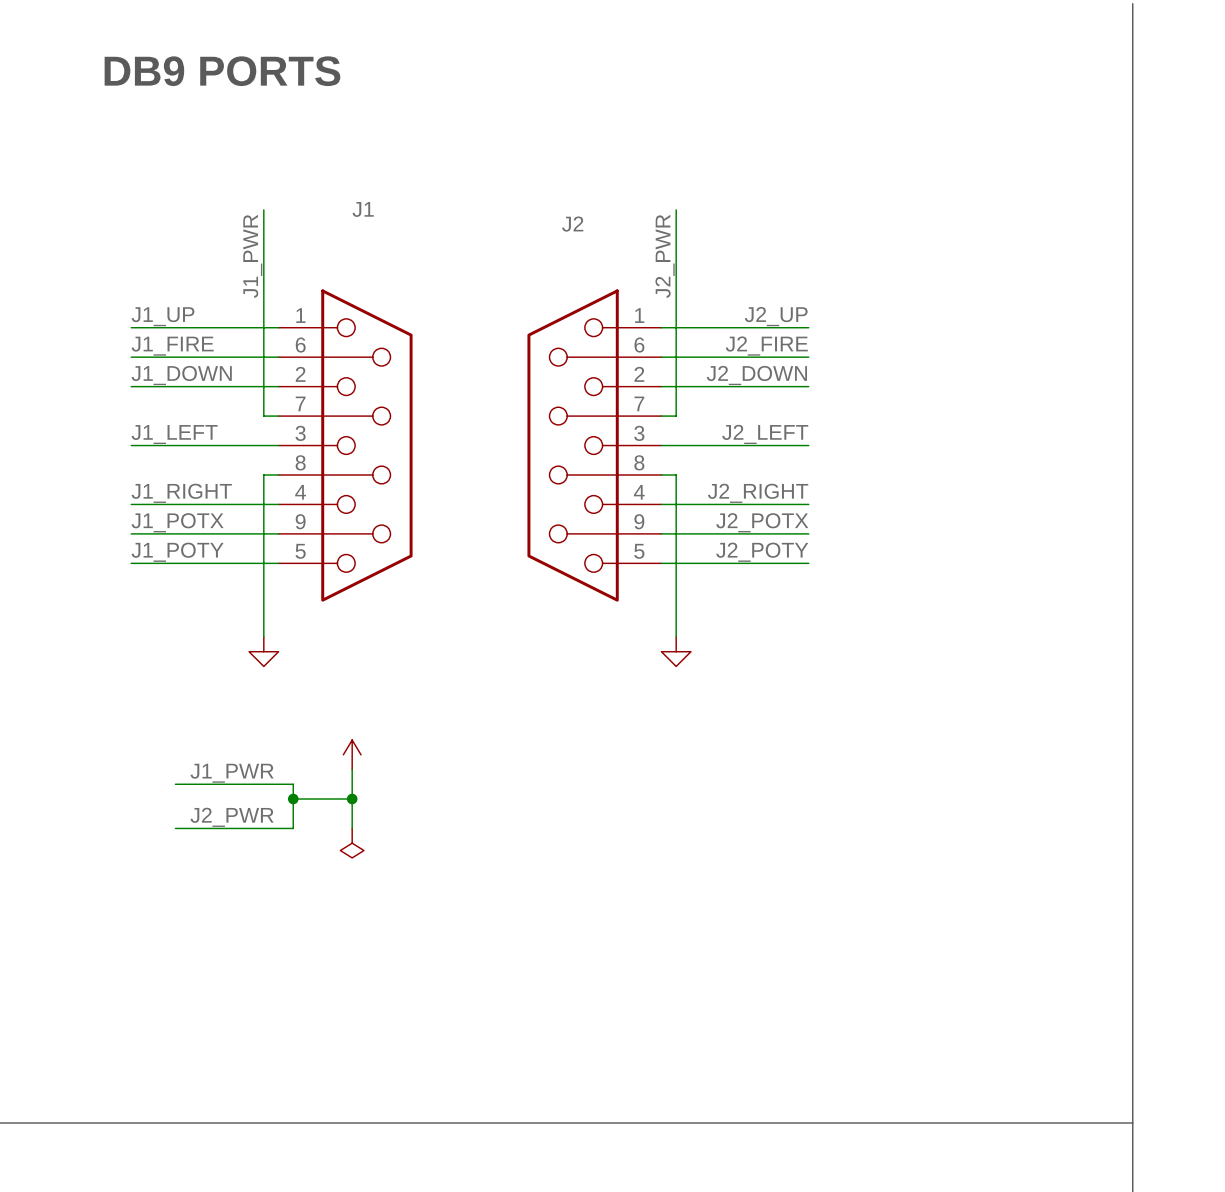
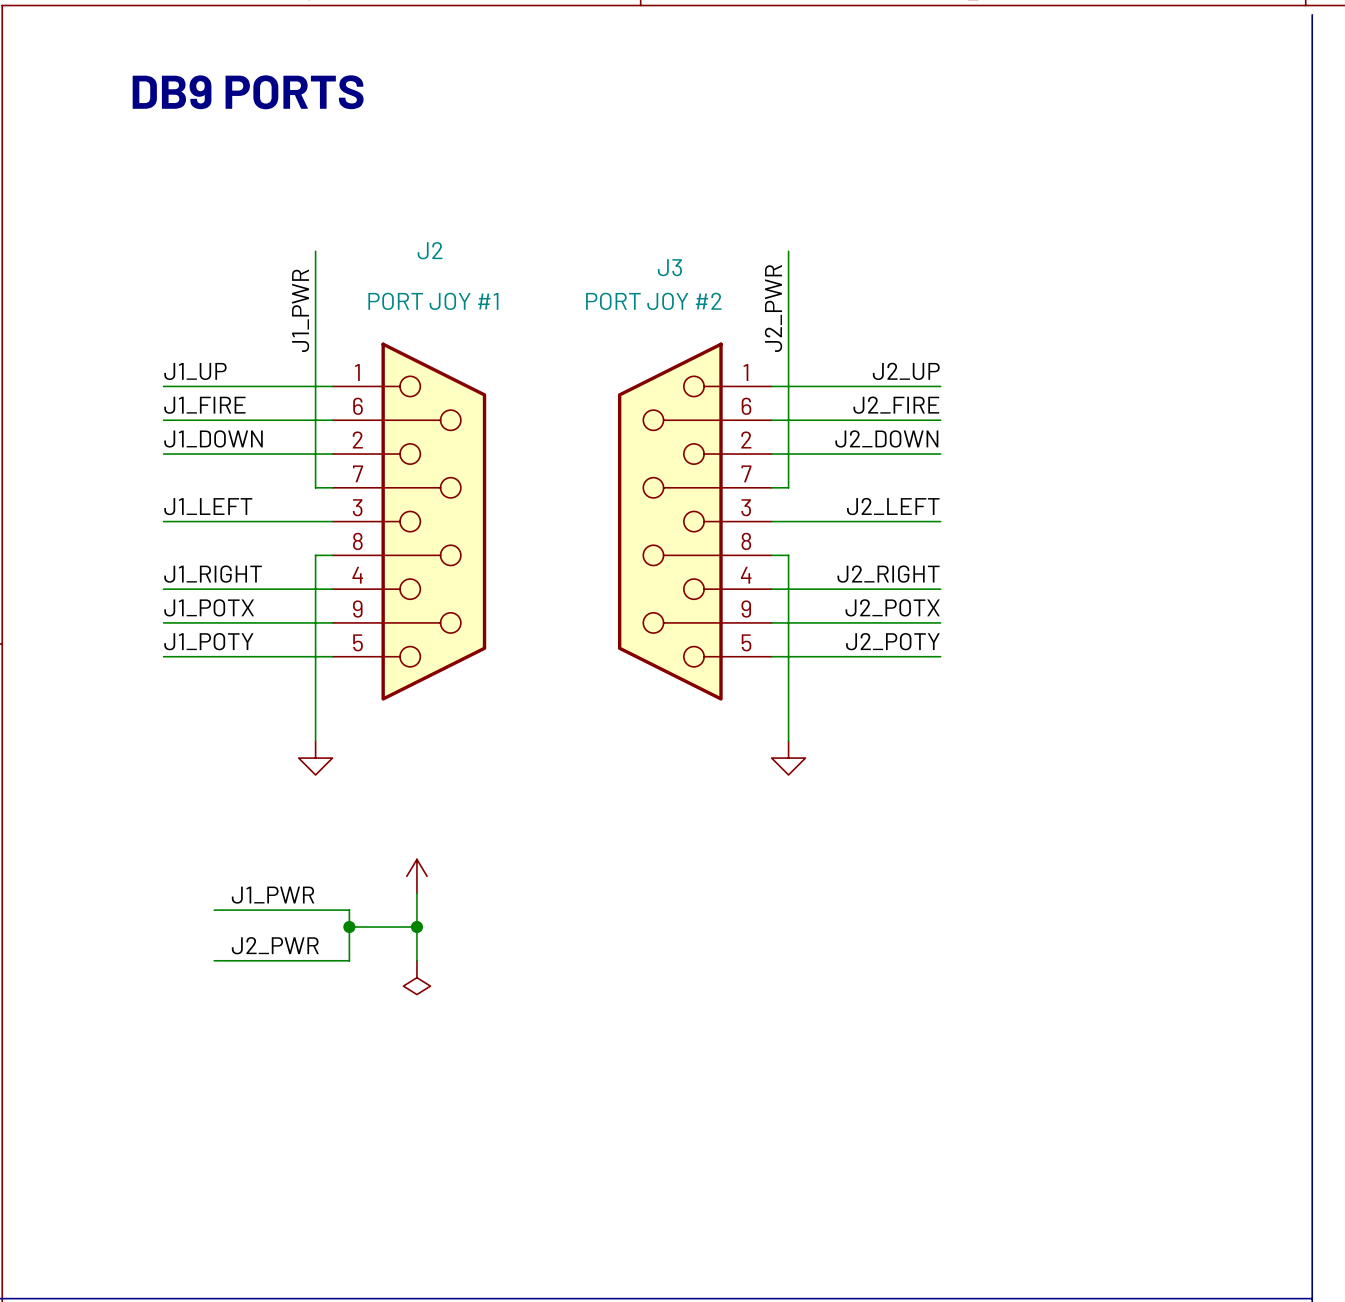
J1 name: J1 (363, 209) -> J2 (430, 250)
J2 name: J2 (572, 224) -> J3 (669, 267)
J1 value: none -> PORT JOY #1 (433, 301)
J2 value: none -> PORT JOY #2 (653, 301)

